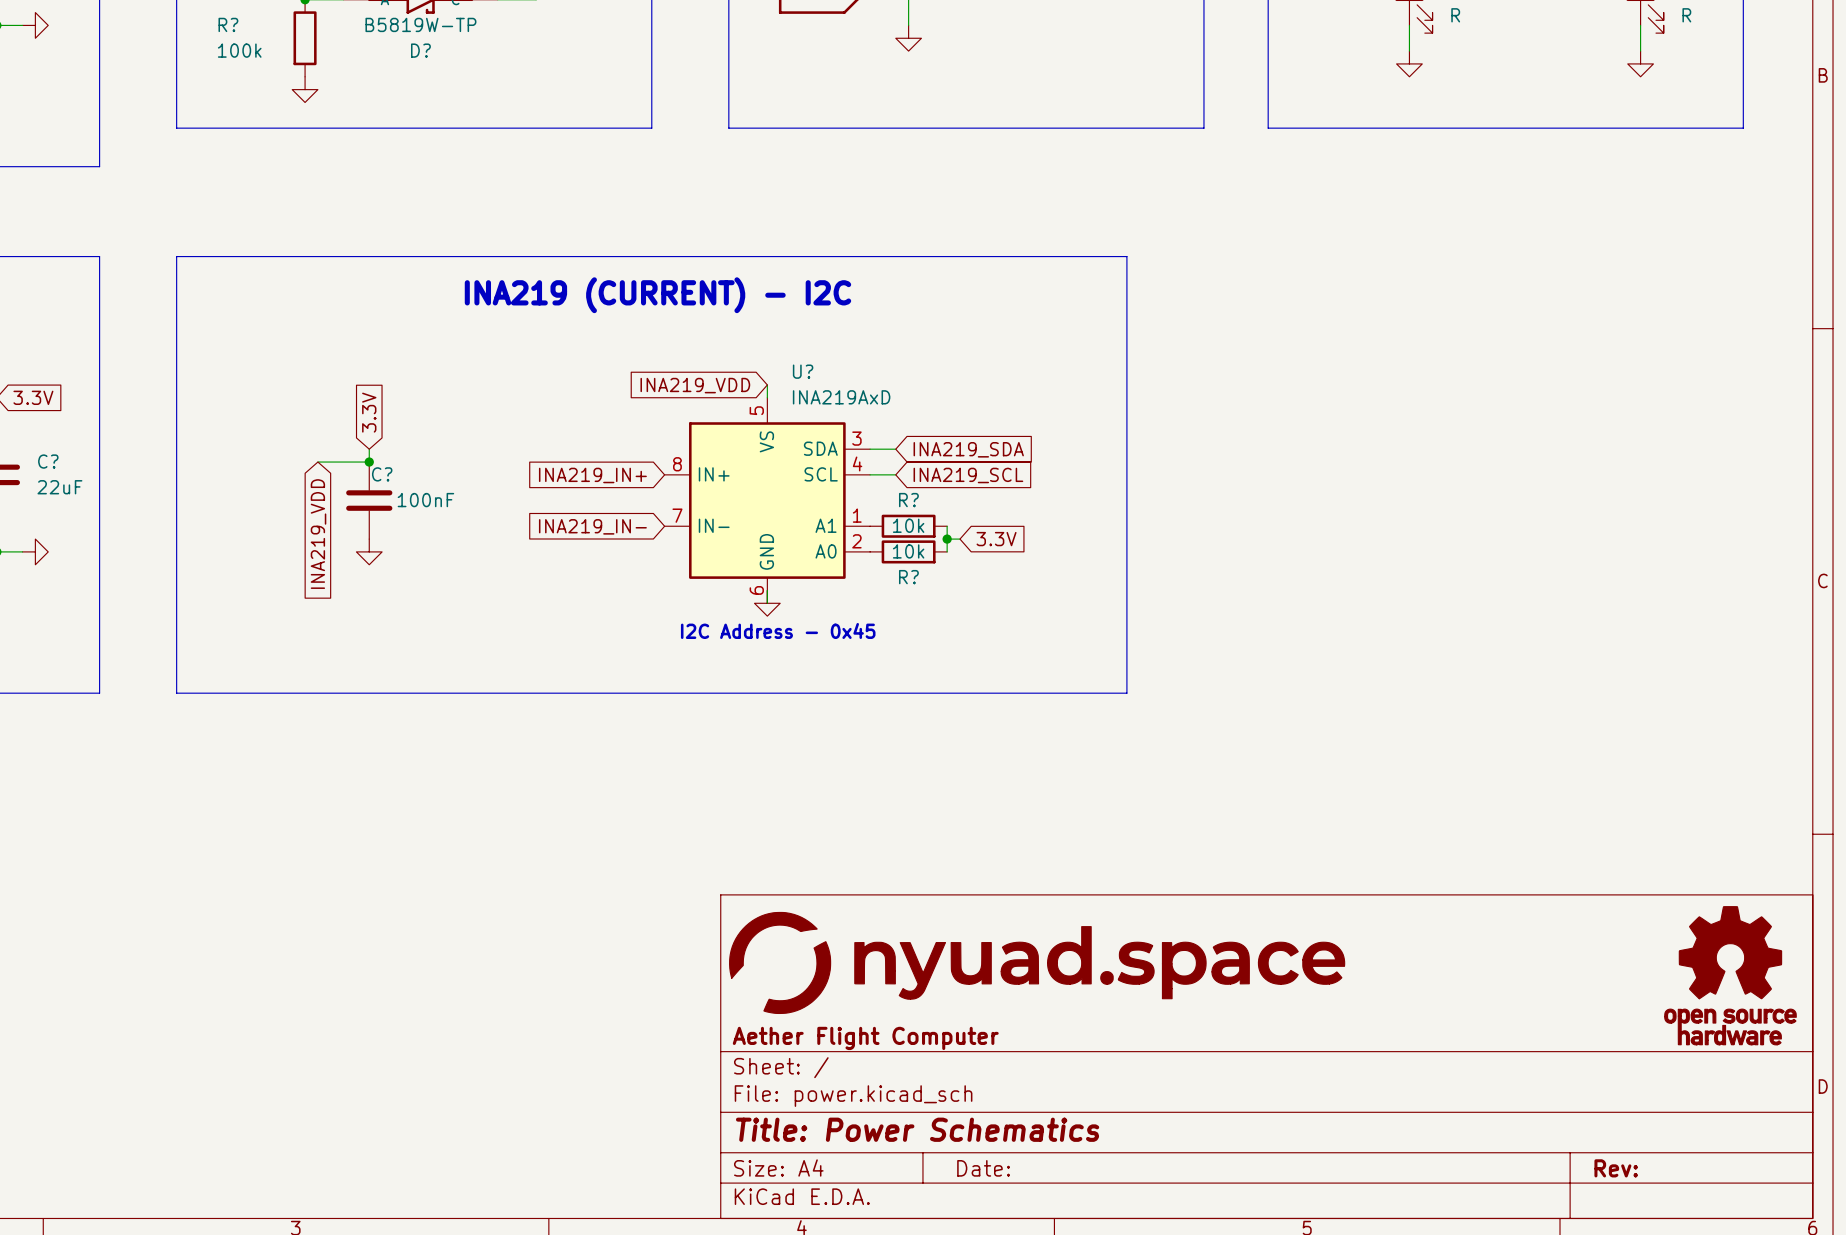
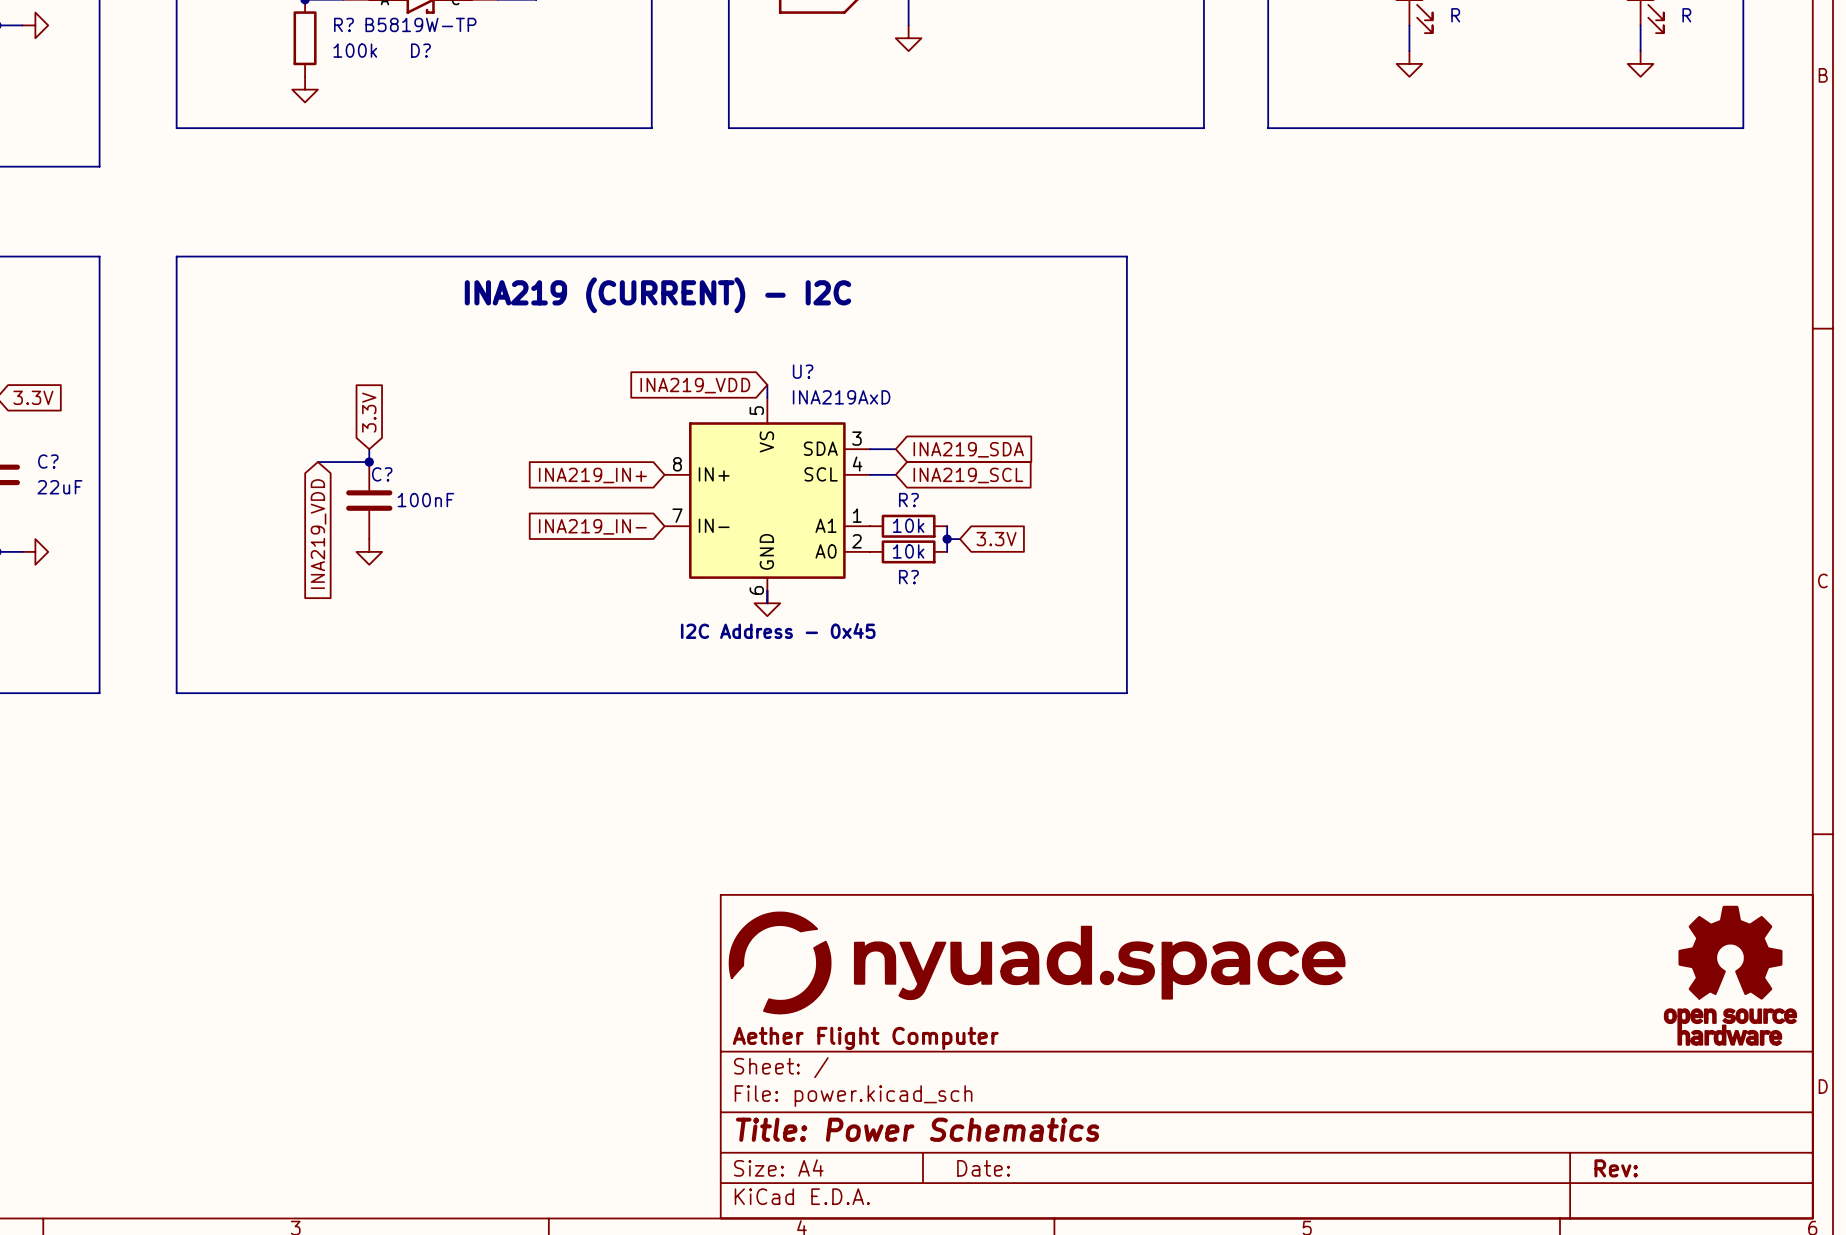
R? name position: R? (228, 24) -> R? (343, 24)
R? value position: 100k (239, 50) -> 100k (355, 50)

